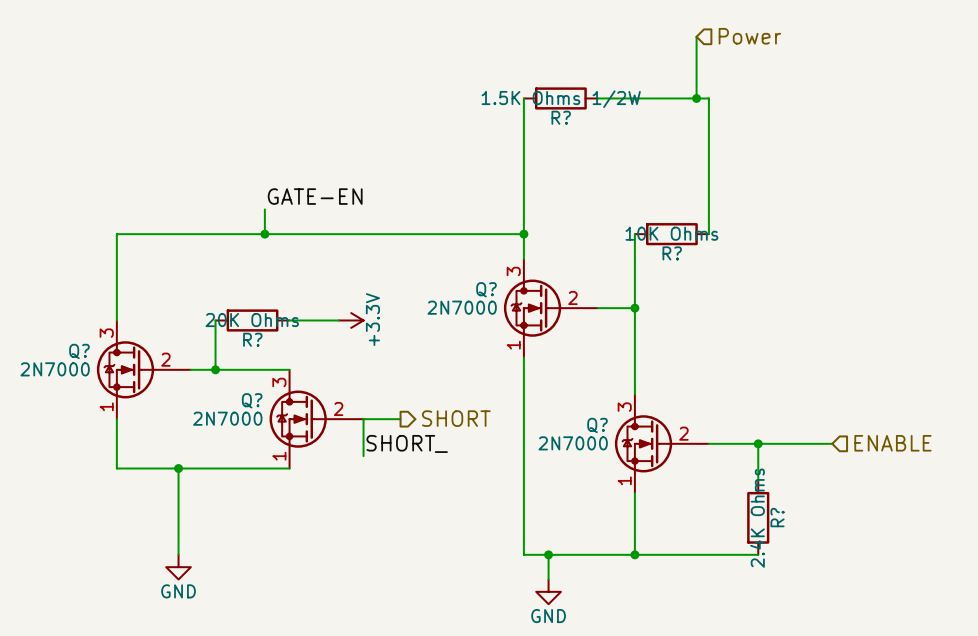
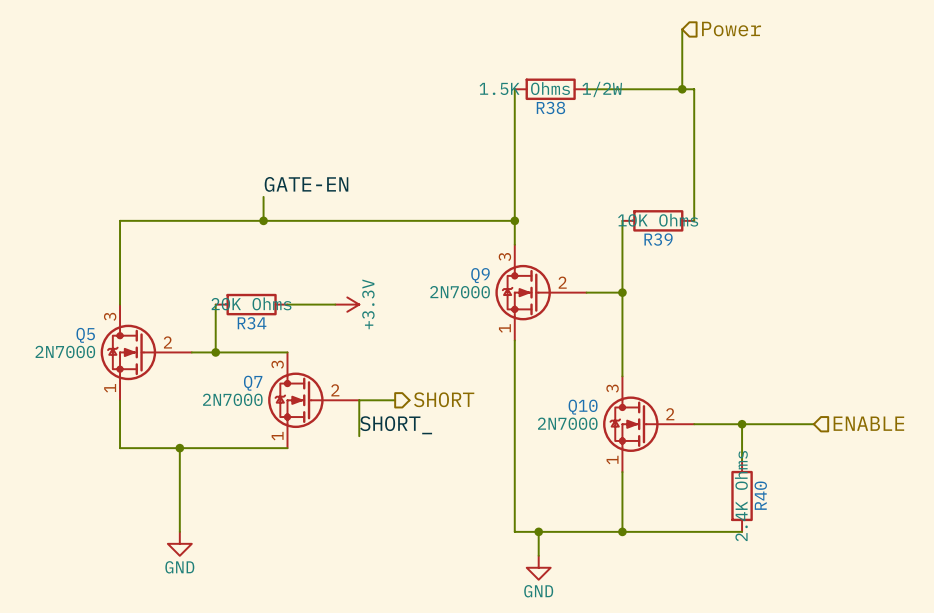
R? name: R? (561, 117) -> R38 (550, 107)
R? name: R? (672, 253) -> R39 (658, 239)
Q? name: Q? (486, 289) -> Q9 (480, 275)
R? name: R? (252, 339) -> R34 (252, 323)
Q? name: Q? (79, 351) -> Q5 (85, 335)
Q? name: Q? (252, 400) -> Q7 (253, 383)
Q? name: Q? (597, 425) -> Q10 (583, 407)
R? name: R? (777, 517) -> R40 (760, 495)

